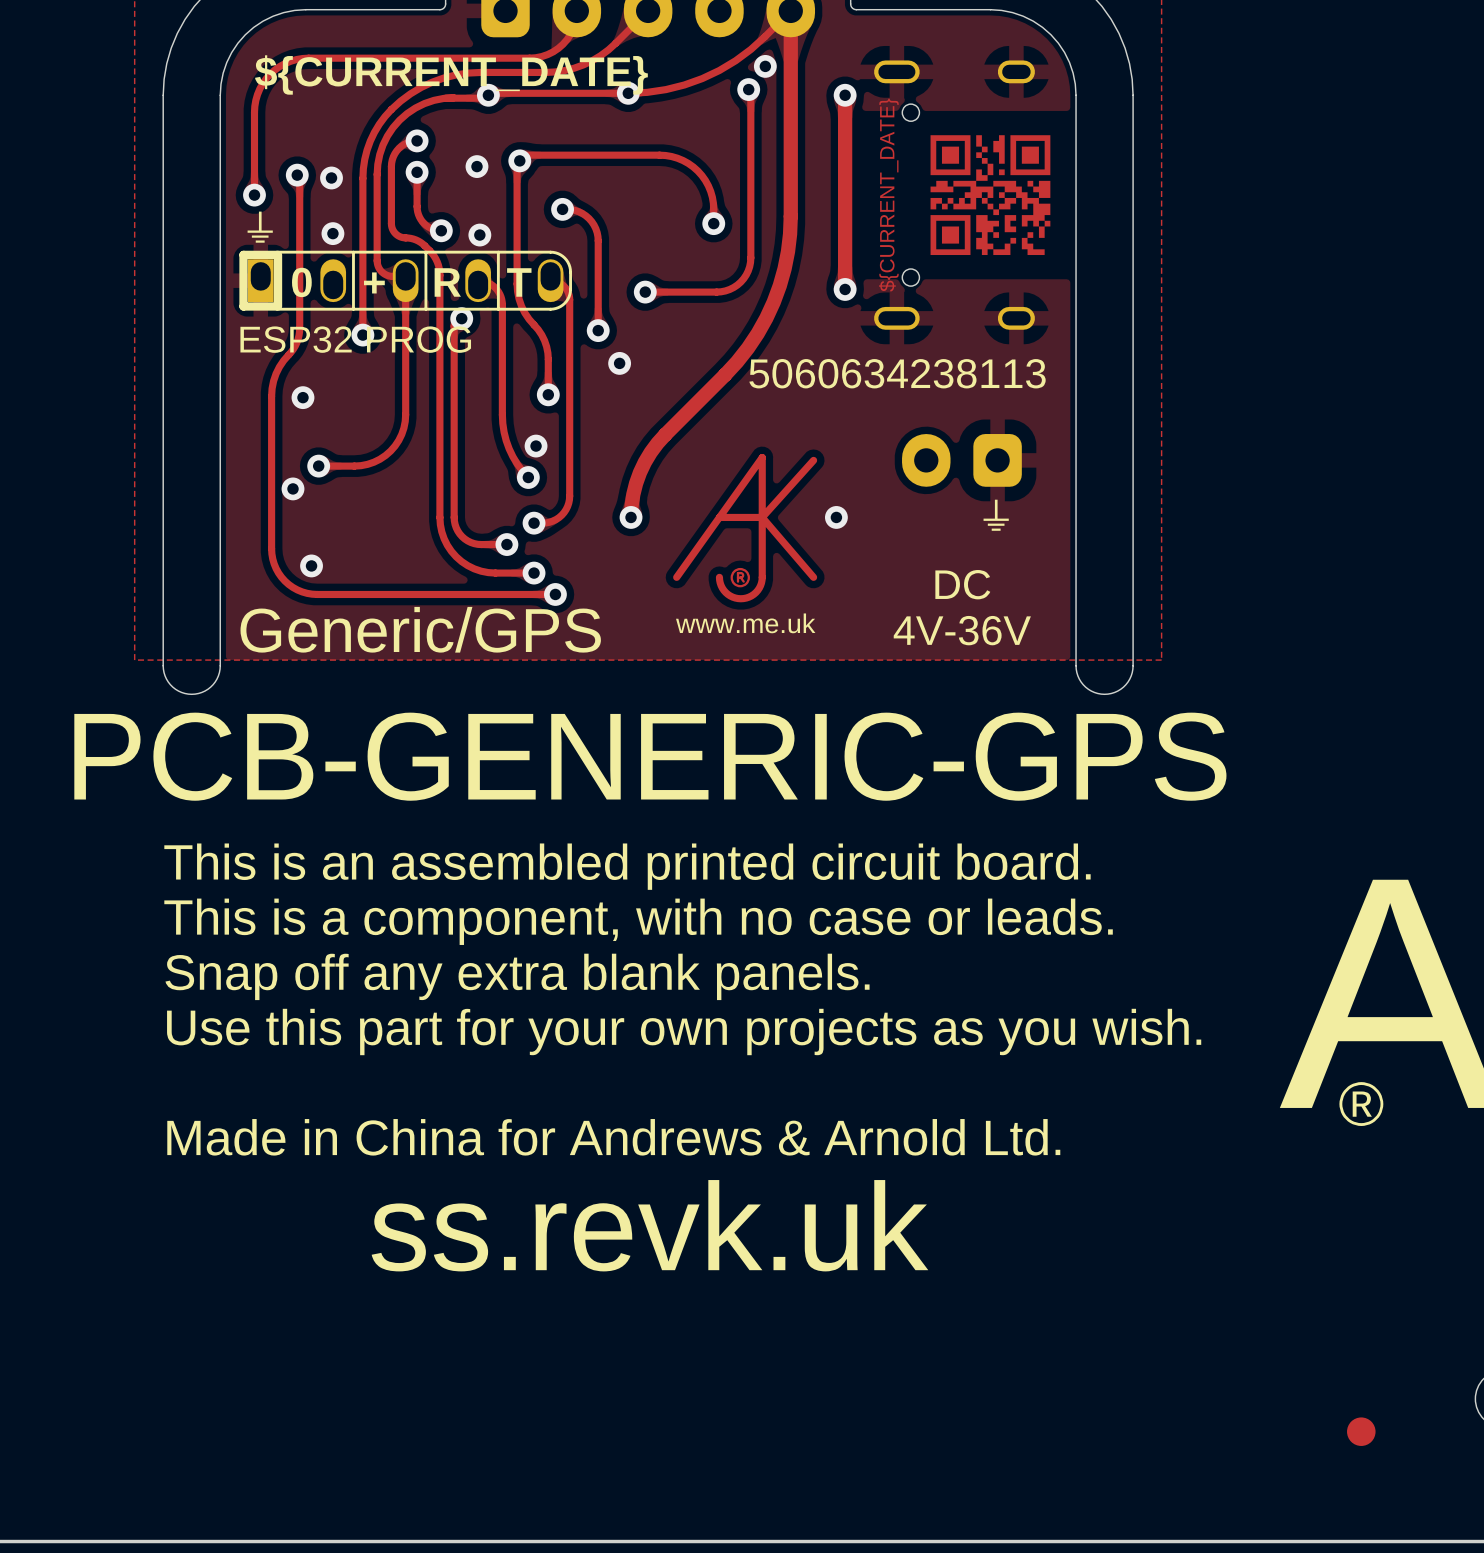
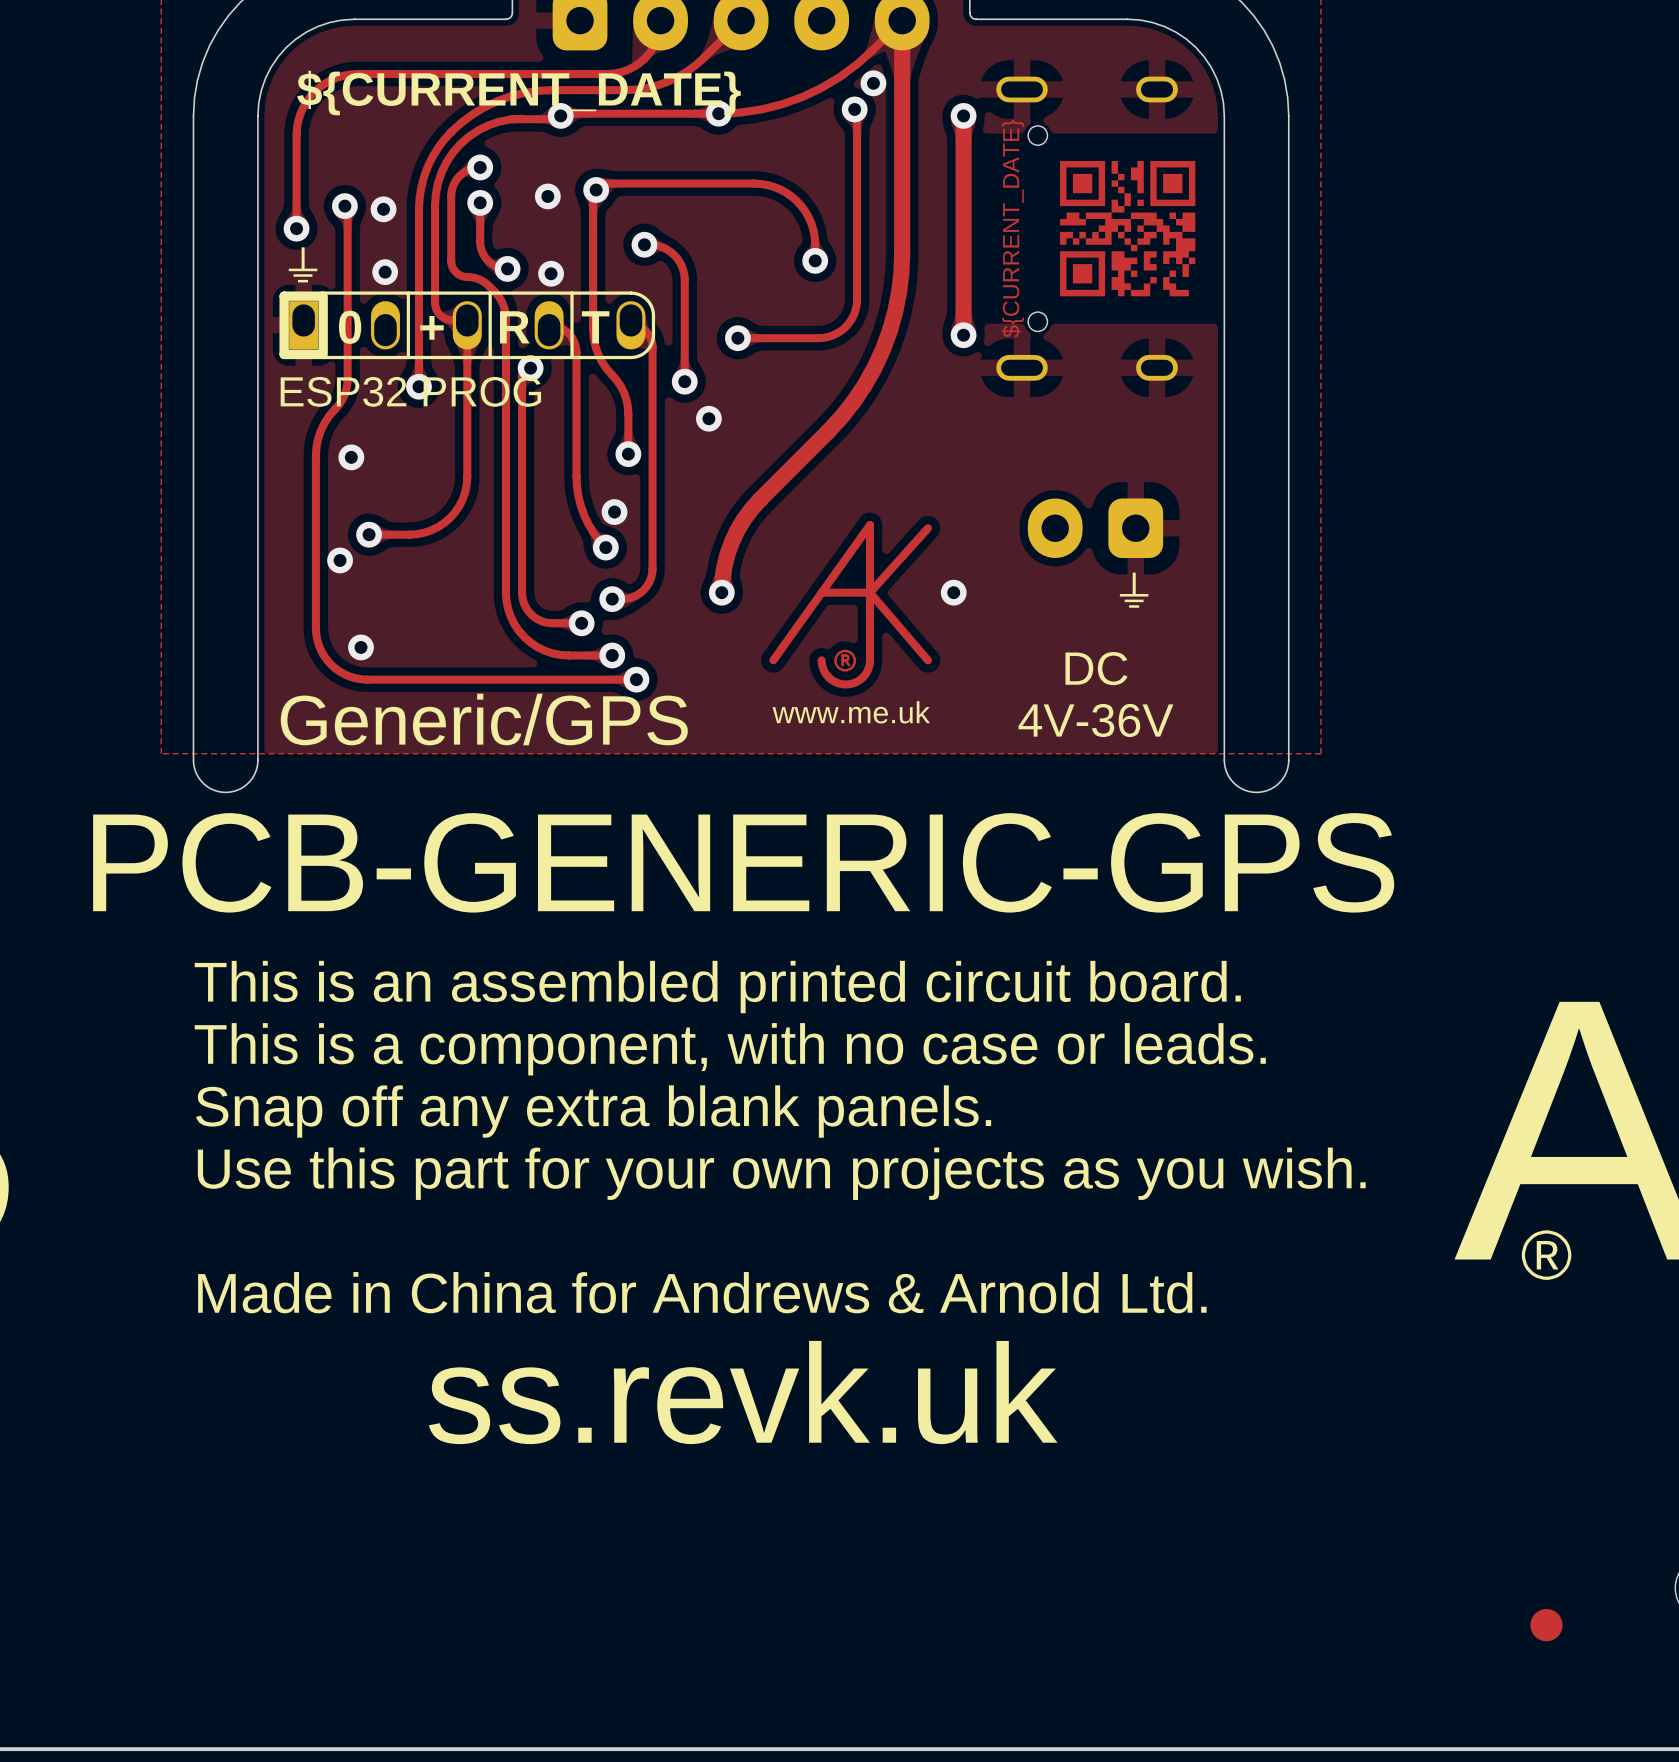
text: 5060634238113 (897, 373) -> none

